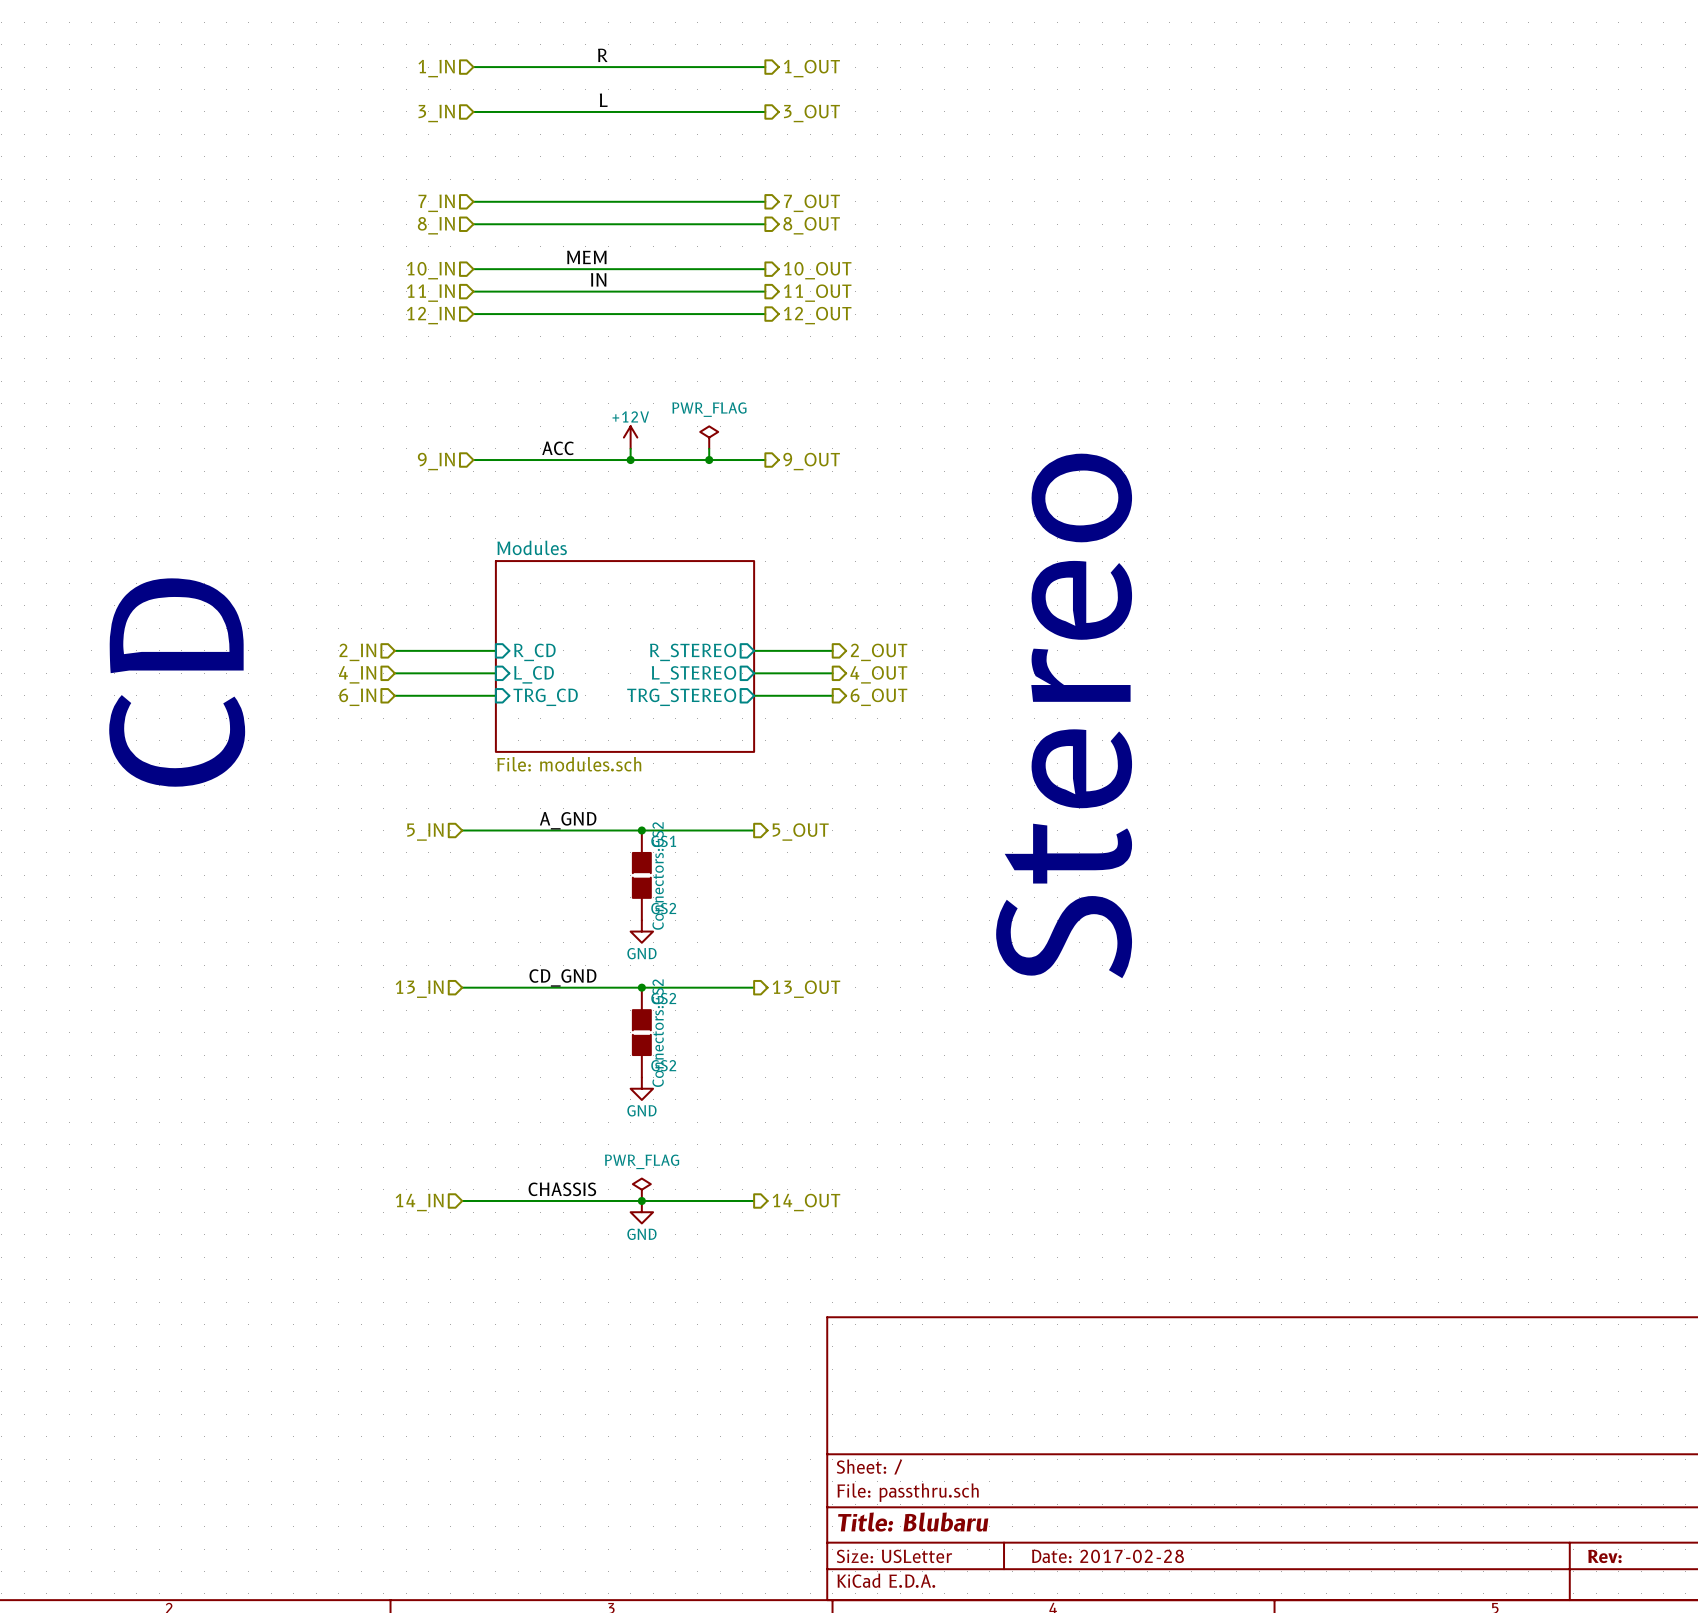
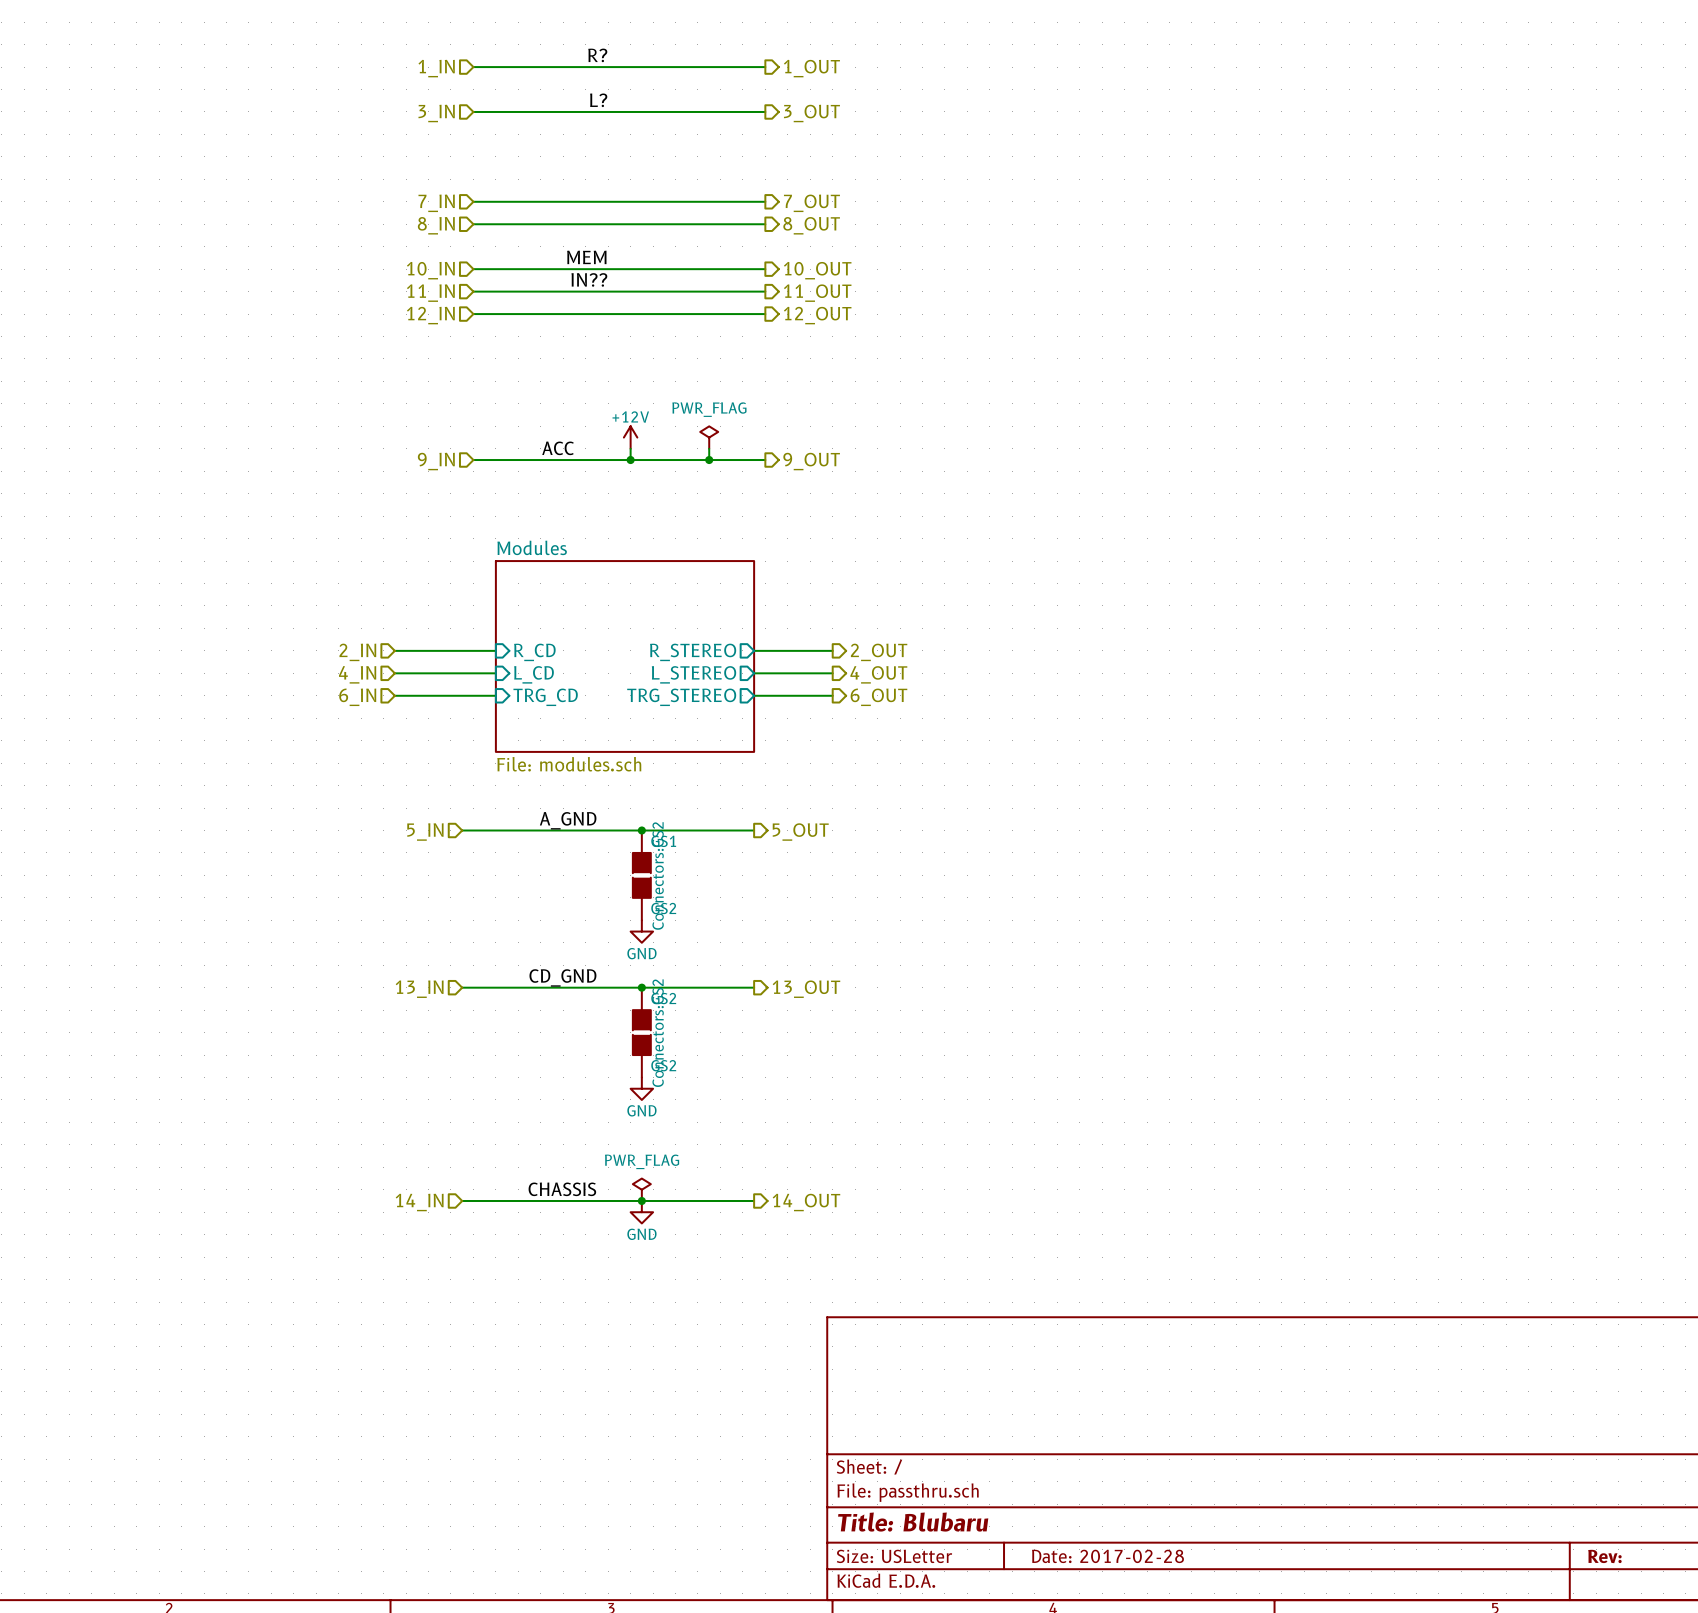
label: R (602, 55) -> R? (597, 55)
label: L (603, 100) -> L? (598, 100)
label: IN (598, 279) -> IN?? (589, 279)
text: CD (177, 682) -> none
text: Stereo (1064, 715) -> none

